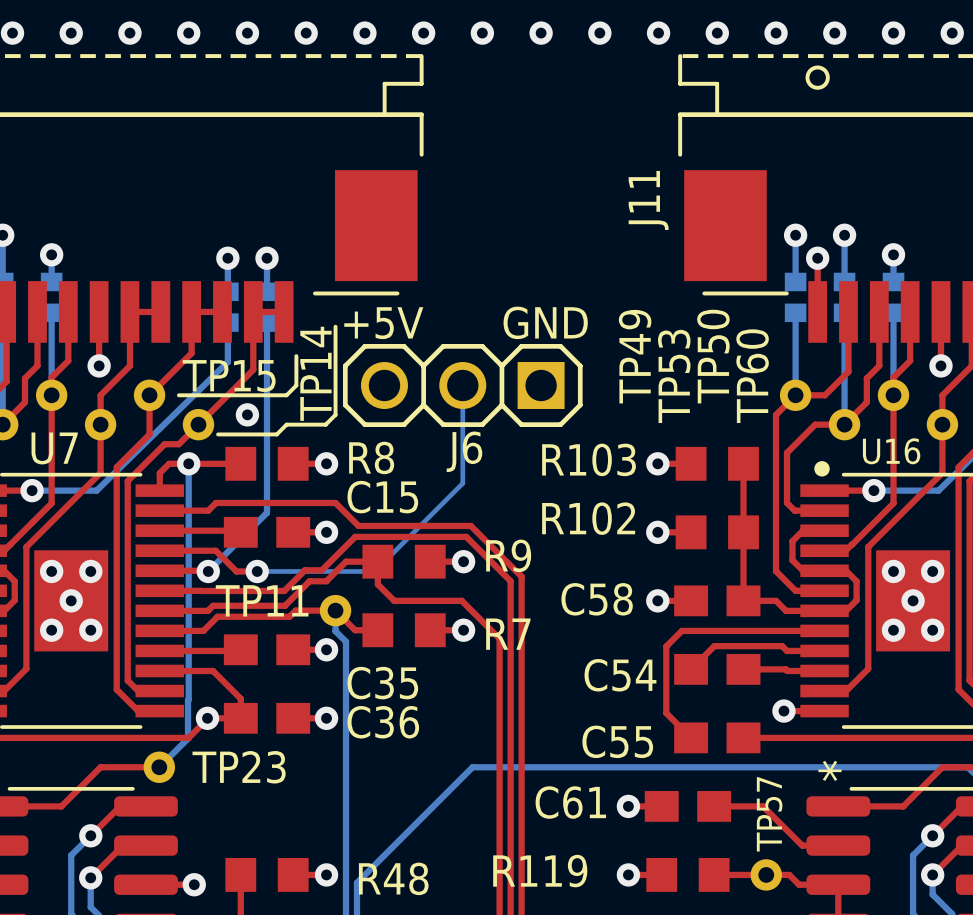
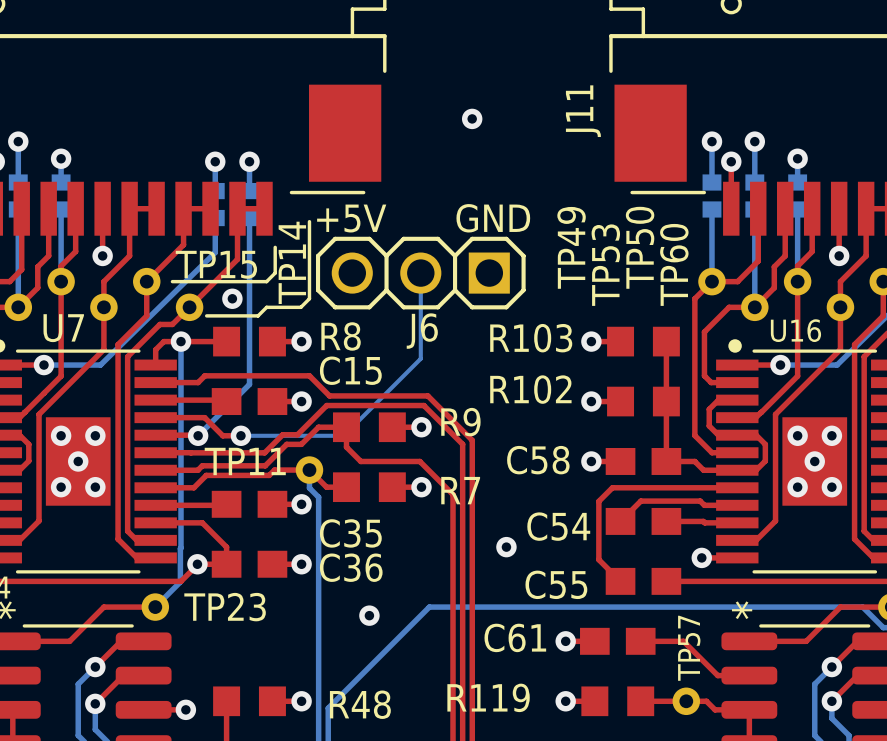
via: none -> (472, 118)
via: none -> (506, 547)
via: none -> (369, 615)

